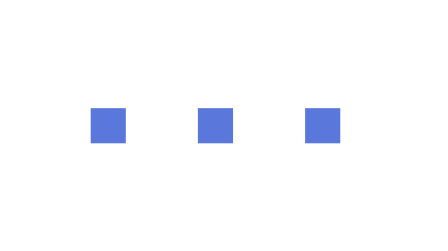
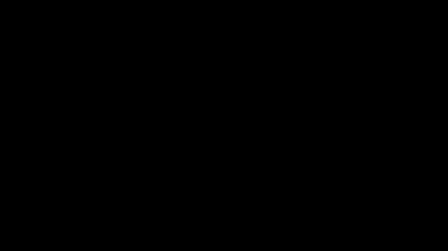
part: (108, 125) -> none
part: (215, 125) -> none
part: (322, 125) -> none

